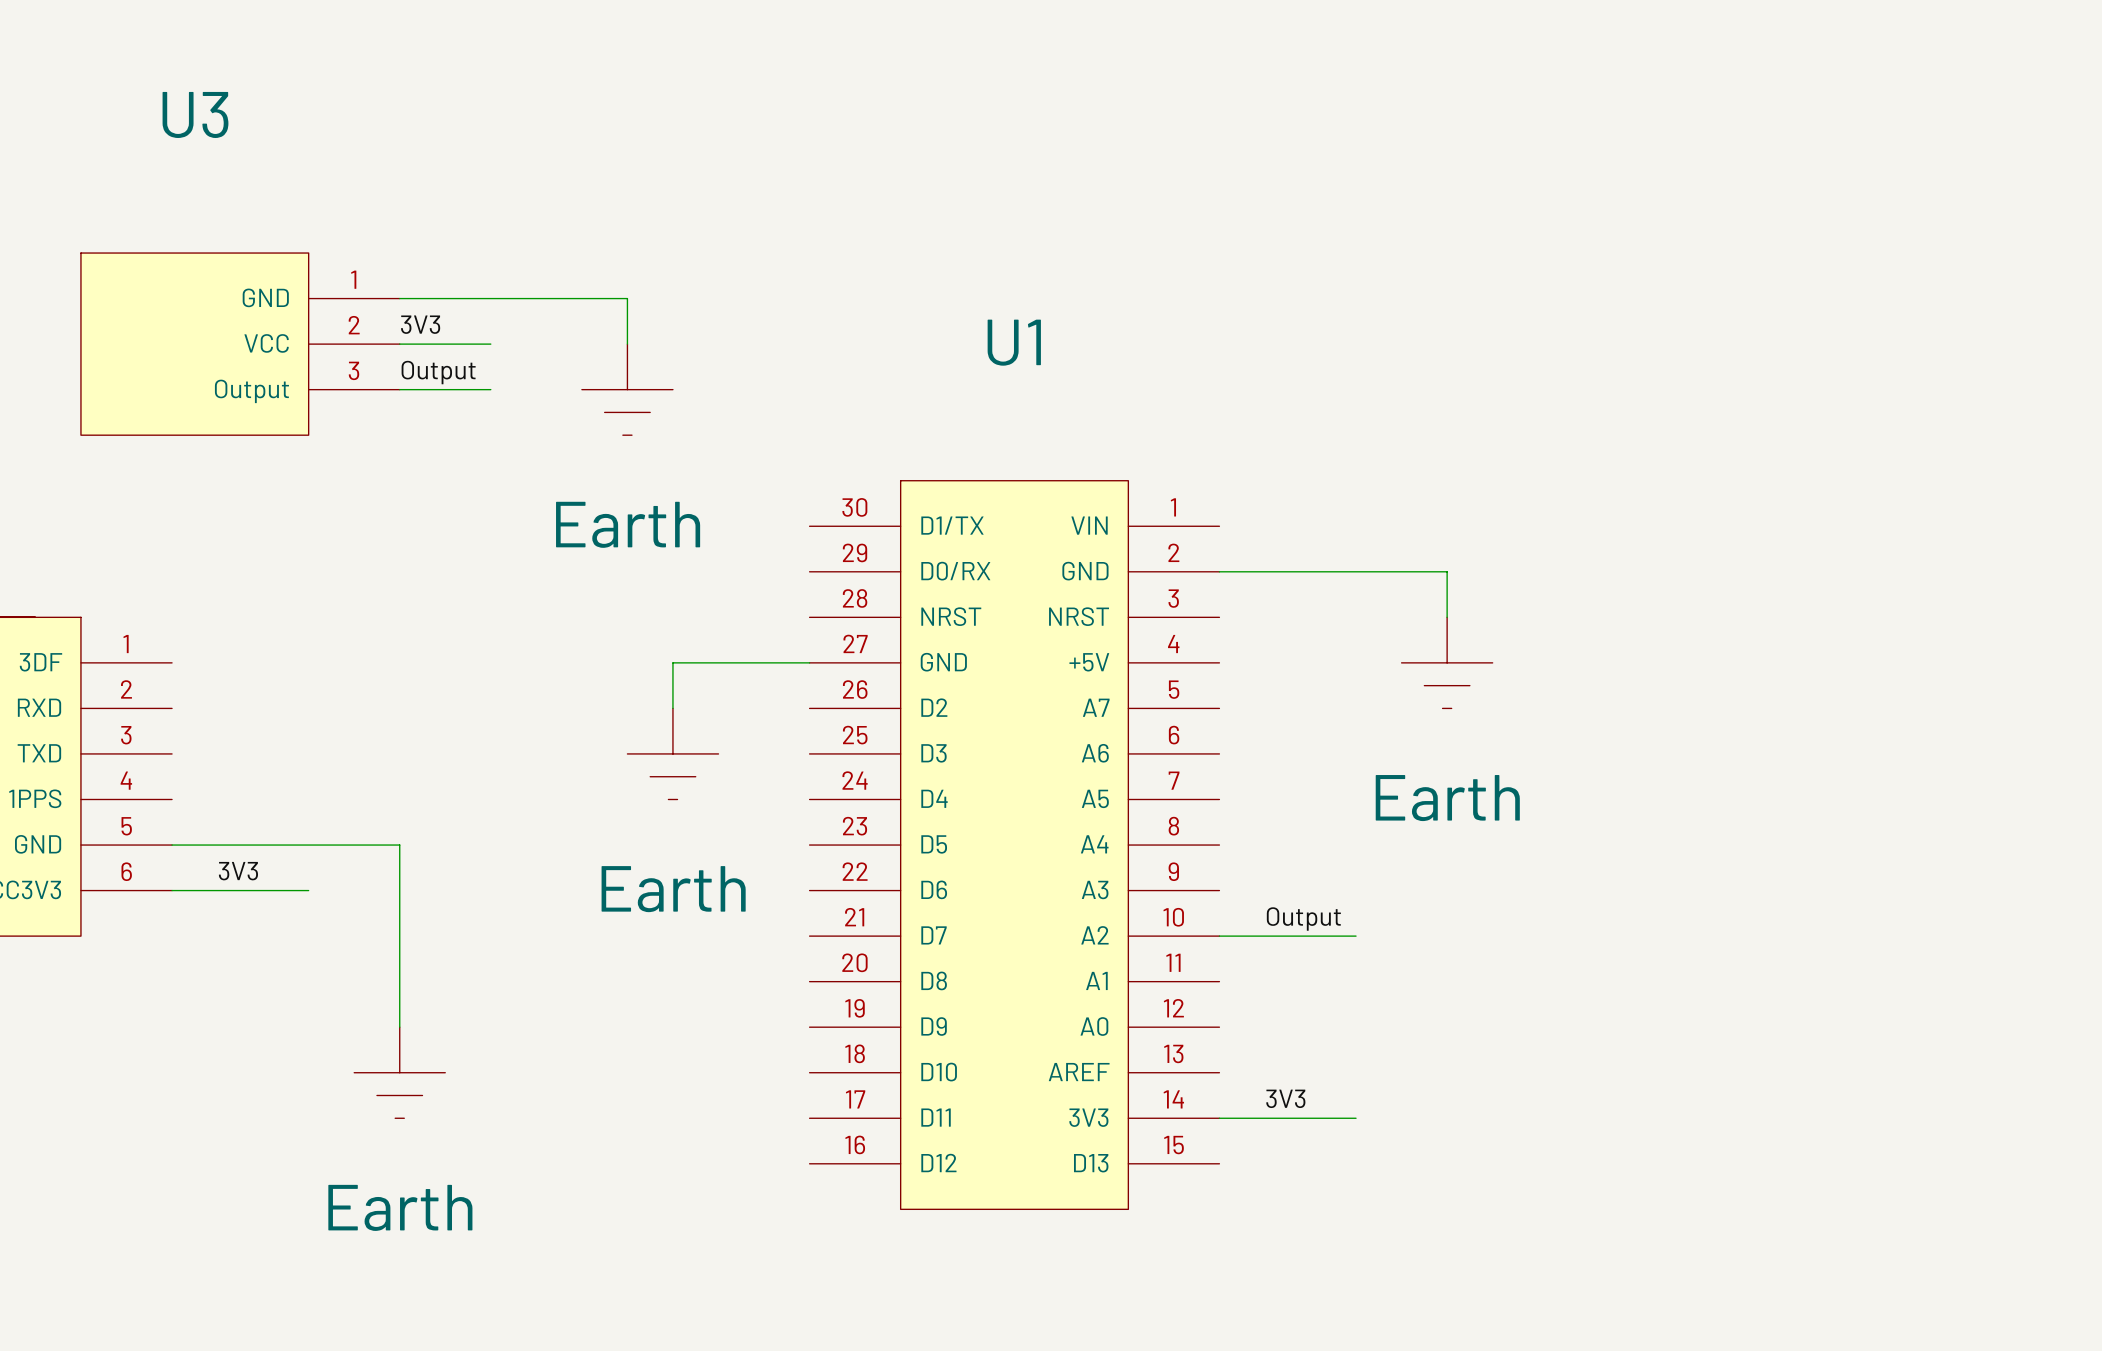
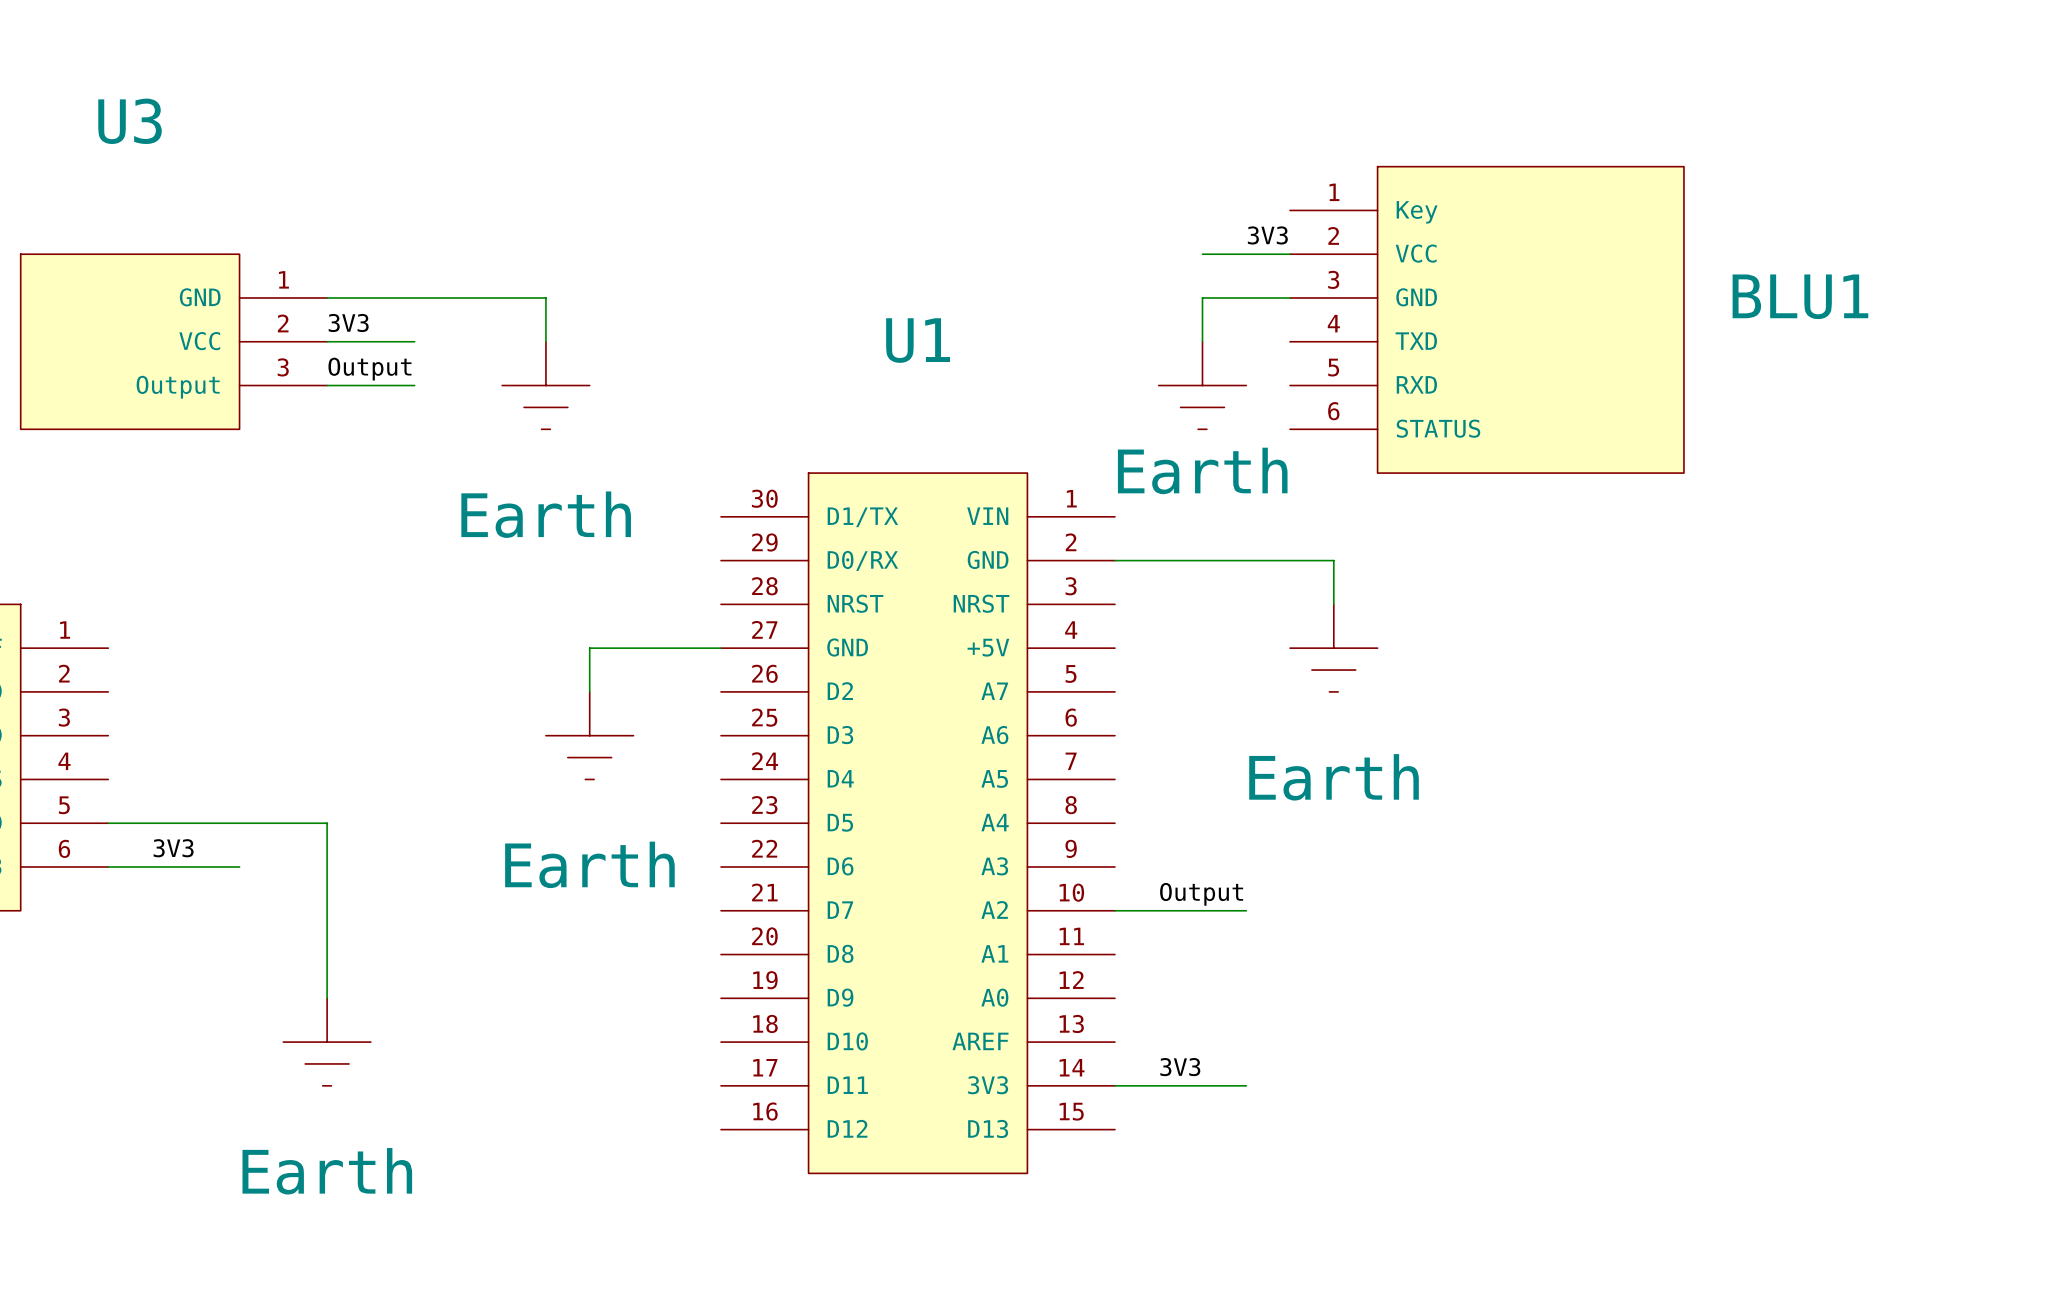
label: none -> 3V3 (1267, 235)
wire: none -> (1202, 254) (1290, 254)
wire: none -> (1290, 297) (1202, 297) (1202, 341)
BLU1: none -> (1487, 319)
power symbol: none -> Earth (1202, 385)

